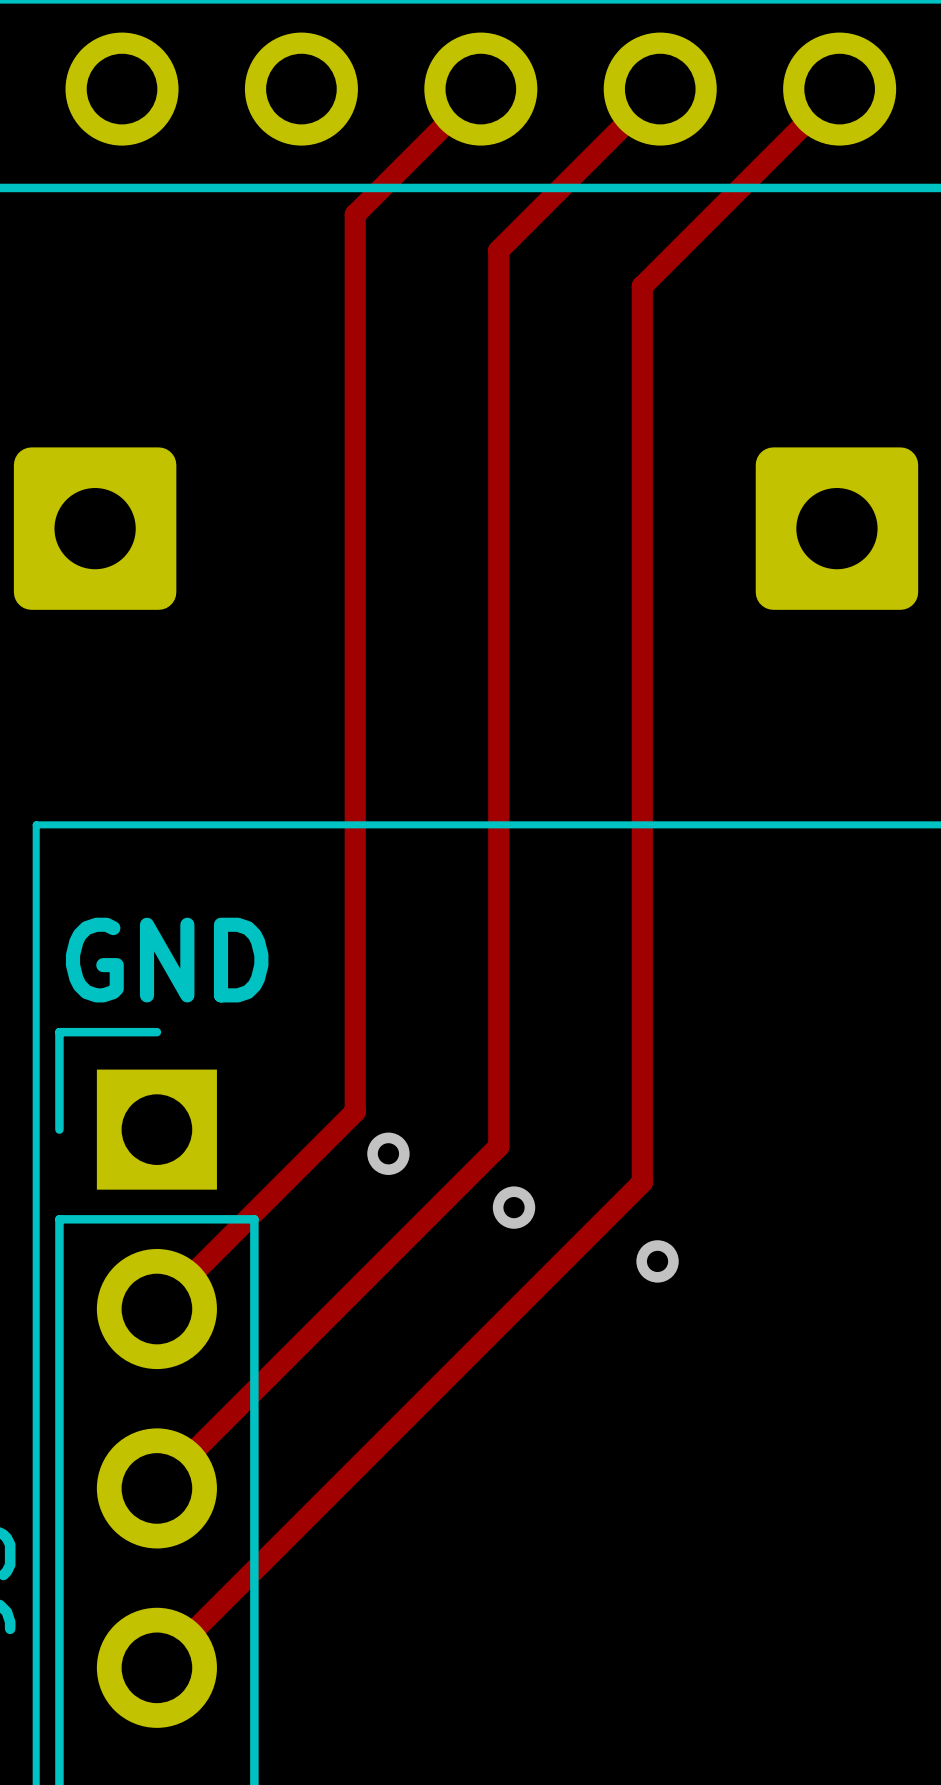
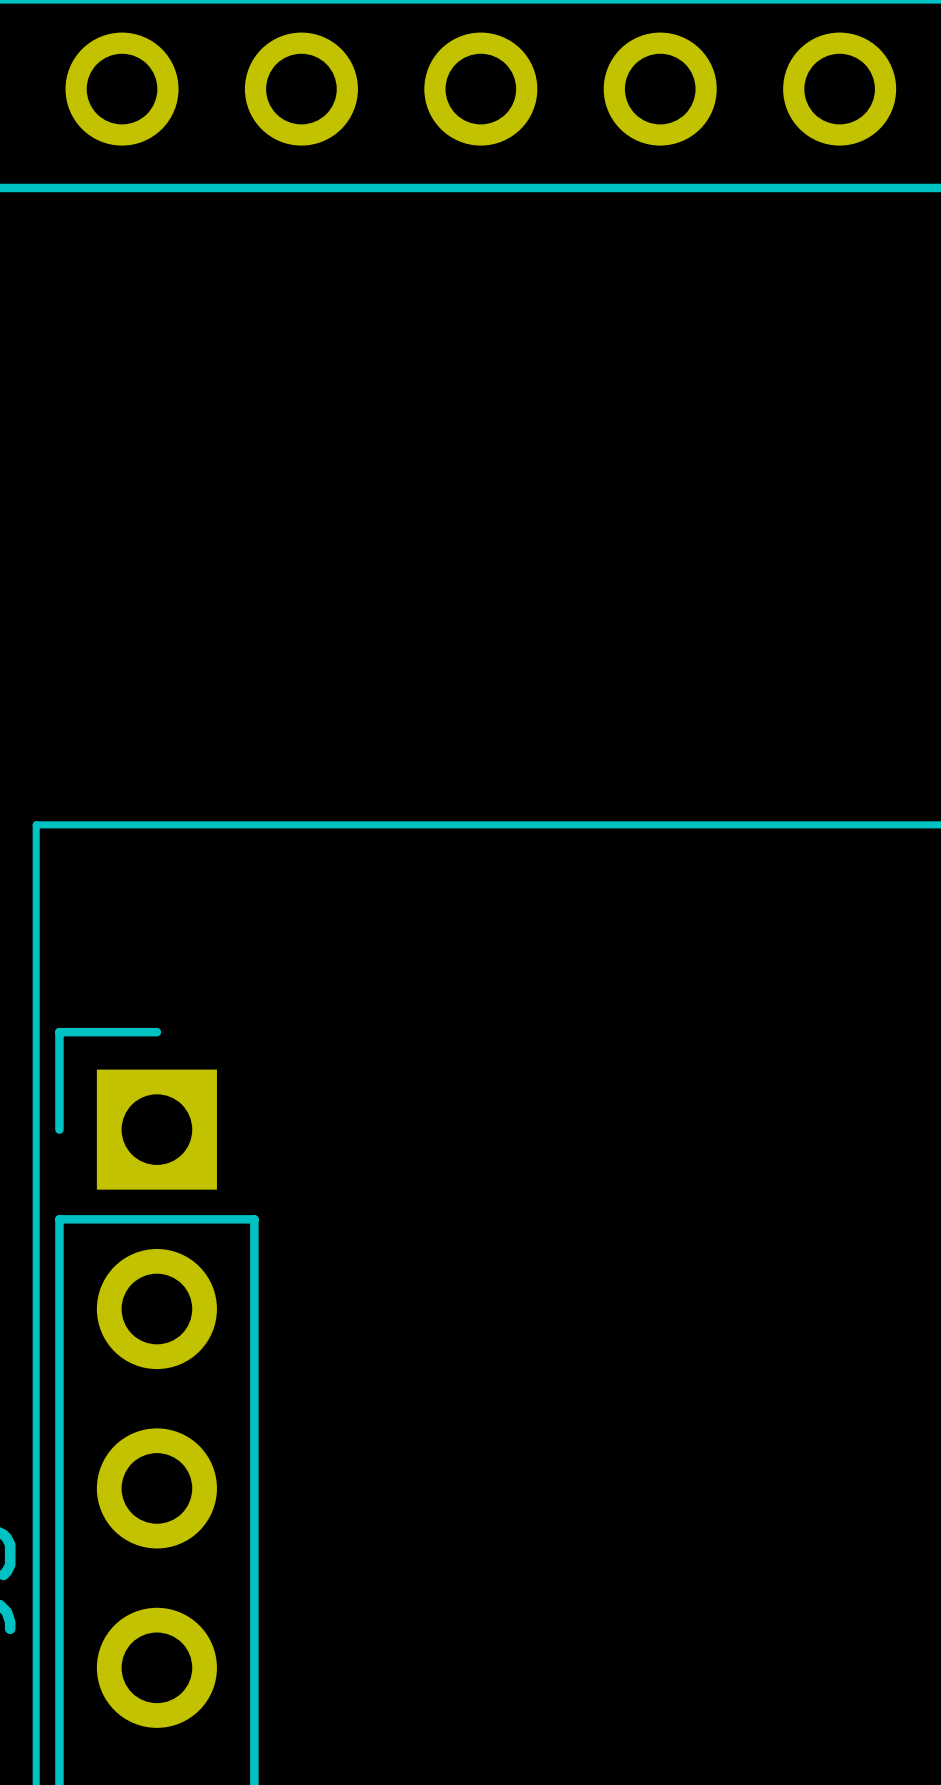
track: (480, 89) (355, 214) (355, 1111) (157, 1309) -> none
track: (660, 89) (498, 250) (498, 1146) (156, 1488) -> none
track: (839, 89) (642, 286) (642, 1182) (156, 1667) -> none
part: (95, 528) -> none
part: (836, 528) -> none
text: GND (167, 960) -> none
via: (388, 1153) -> none
via: (514, 1207) -> none
via: (657, 1261) -> none

